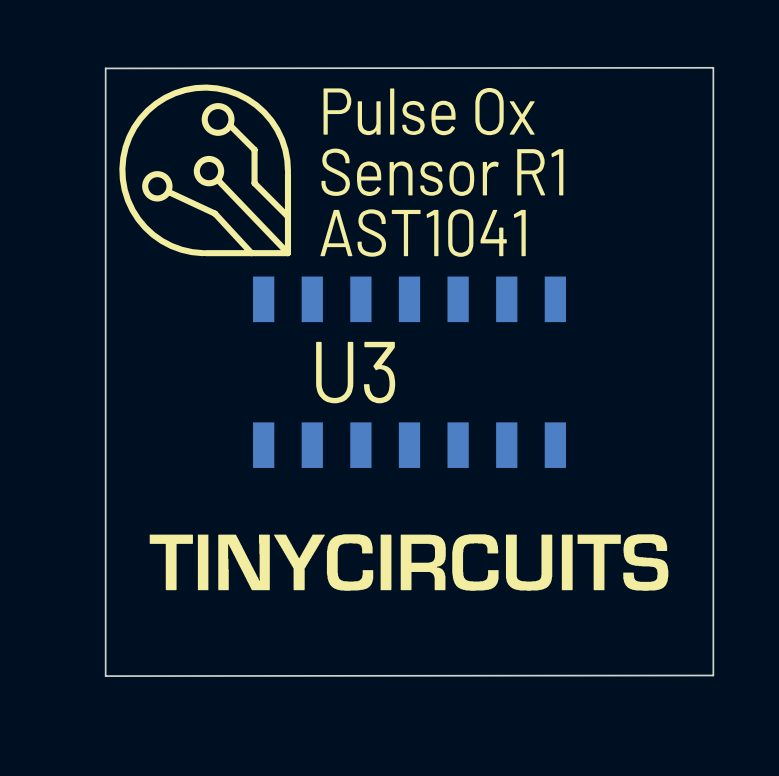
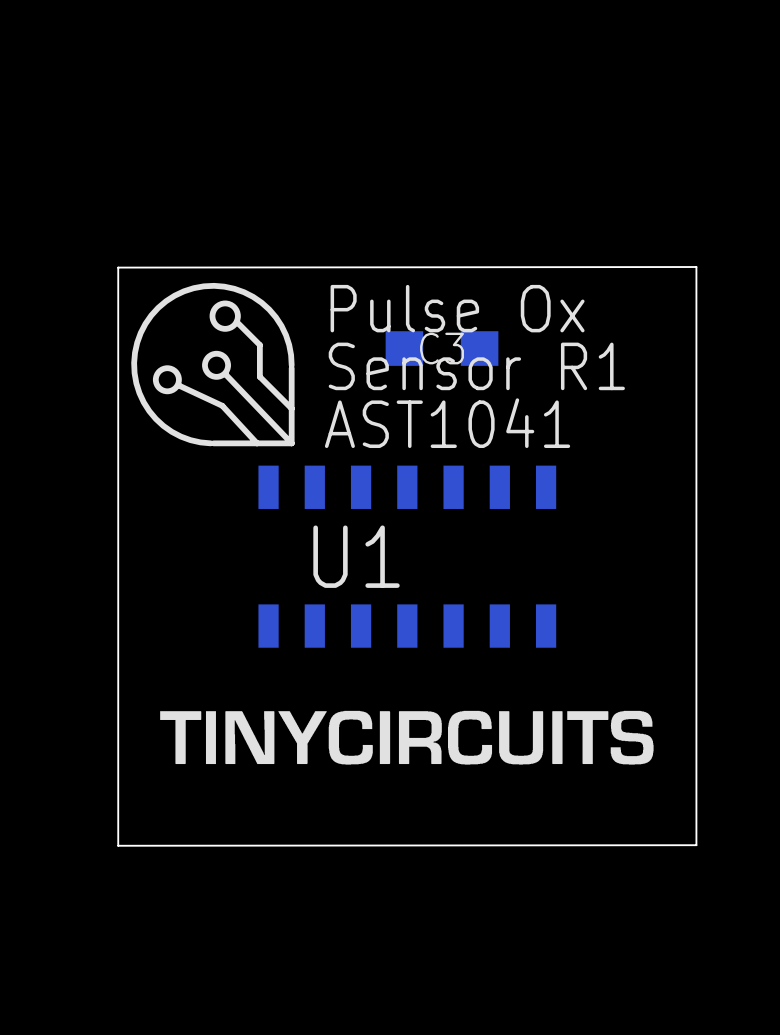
C3: none -> (442, 348)
U3 name: U3 (355, 372) -> U1 (356, 556)

